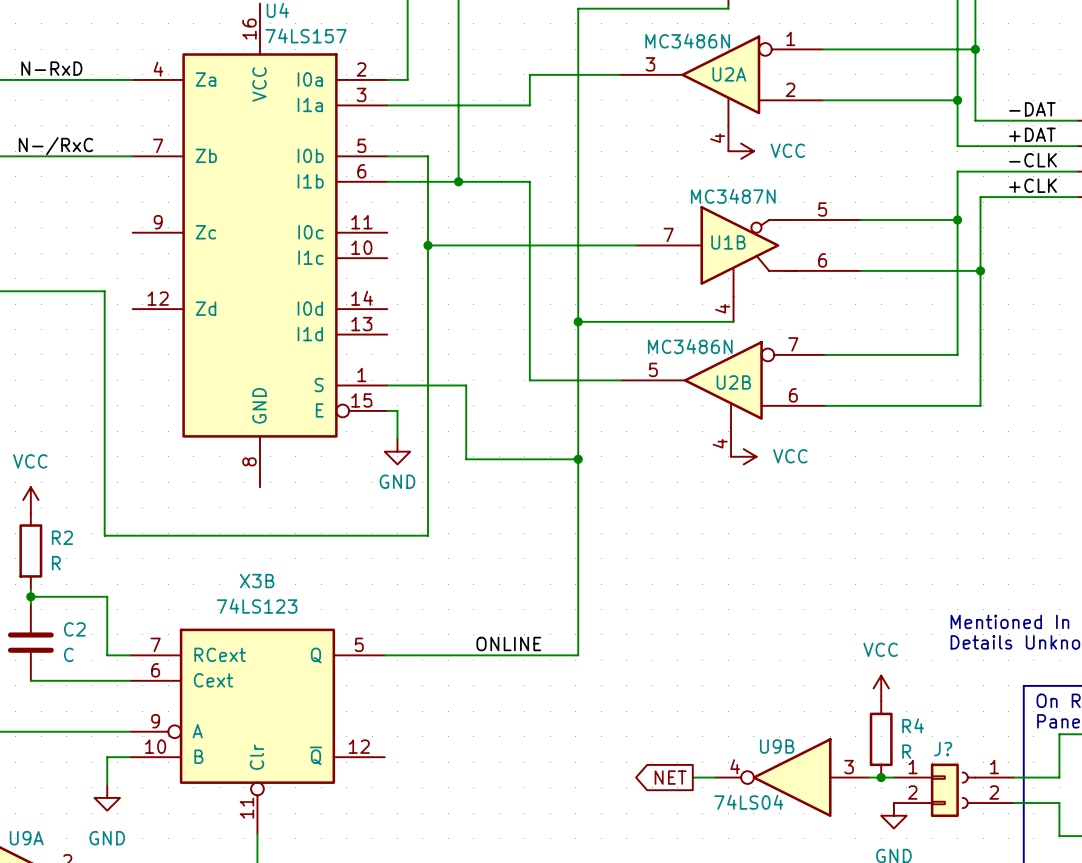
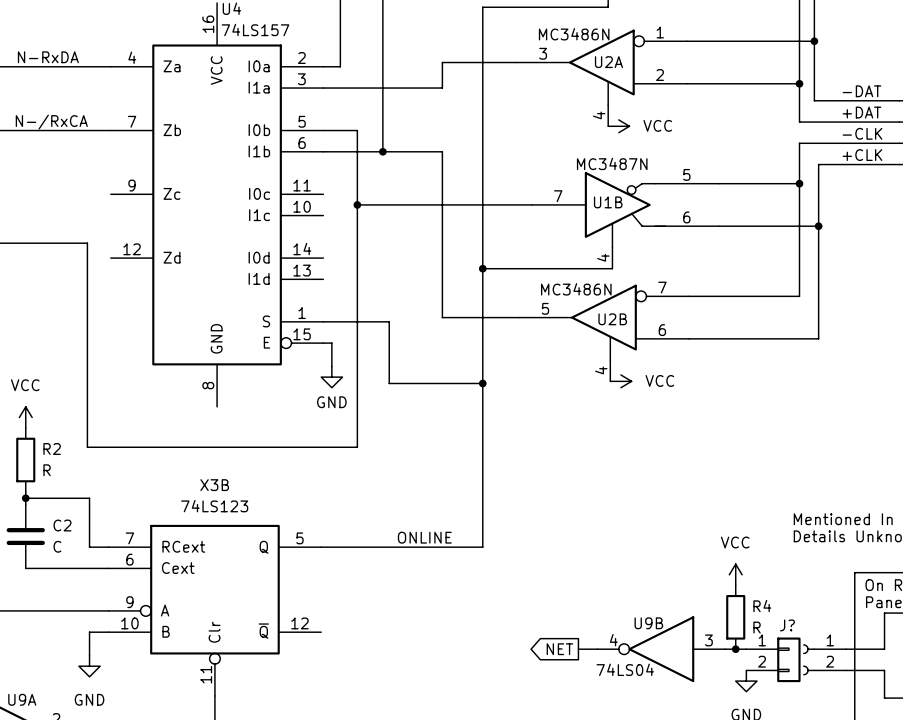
label: N-RxD (51, 68) -> N-RxDA (48, 57)
label: N-/RxC (55, 146) -> N-/RxCA (51, 122)

